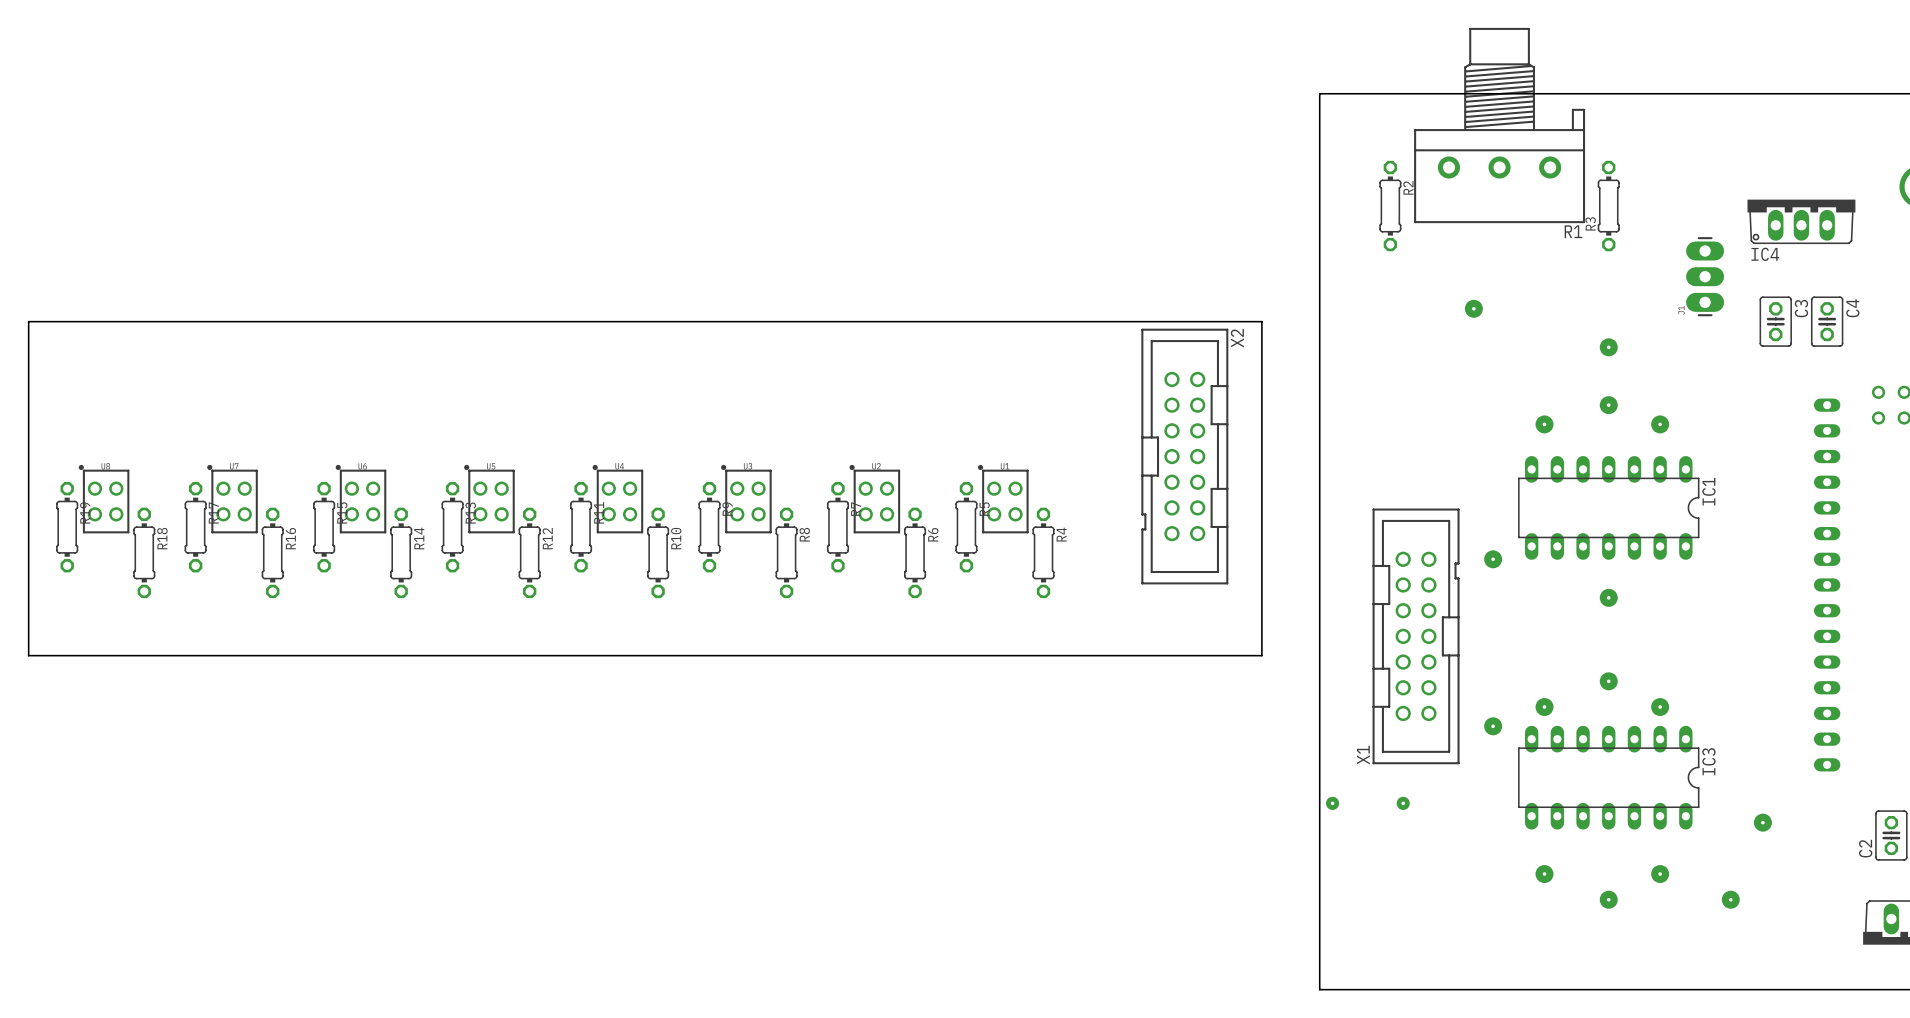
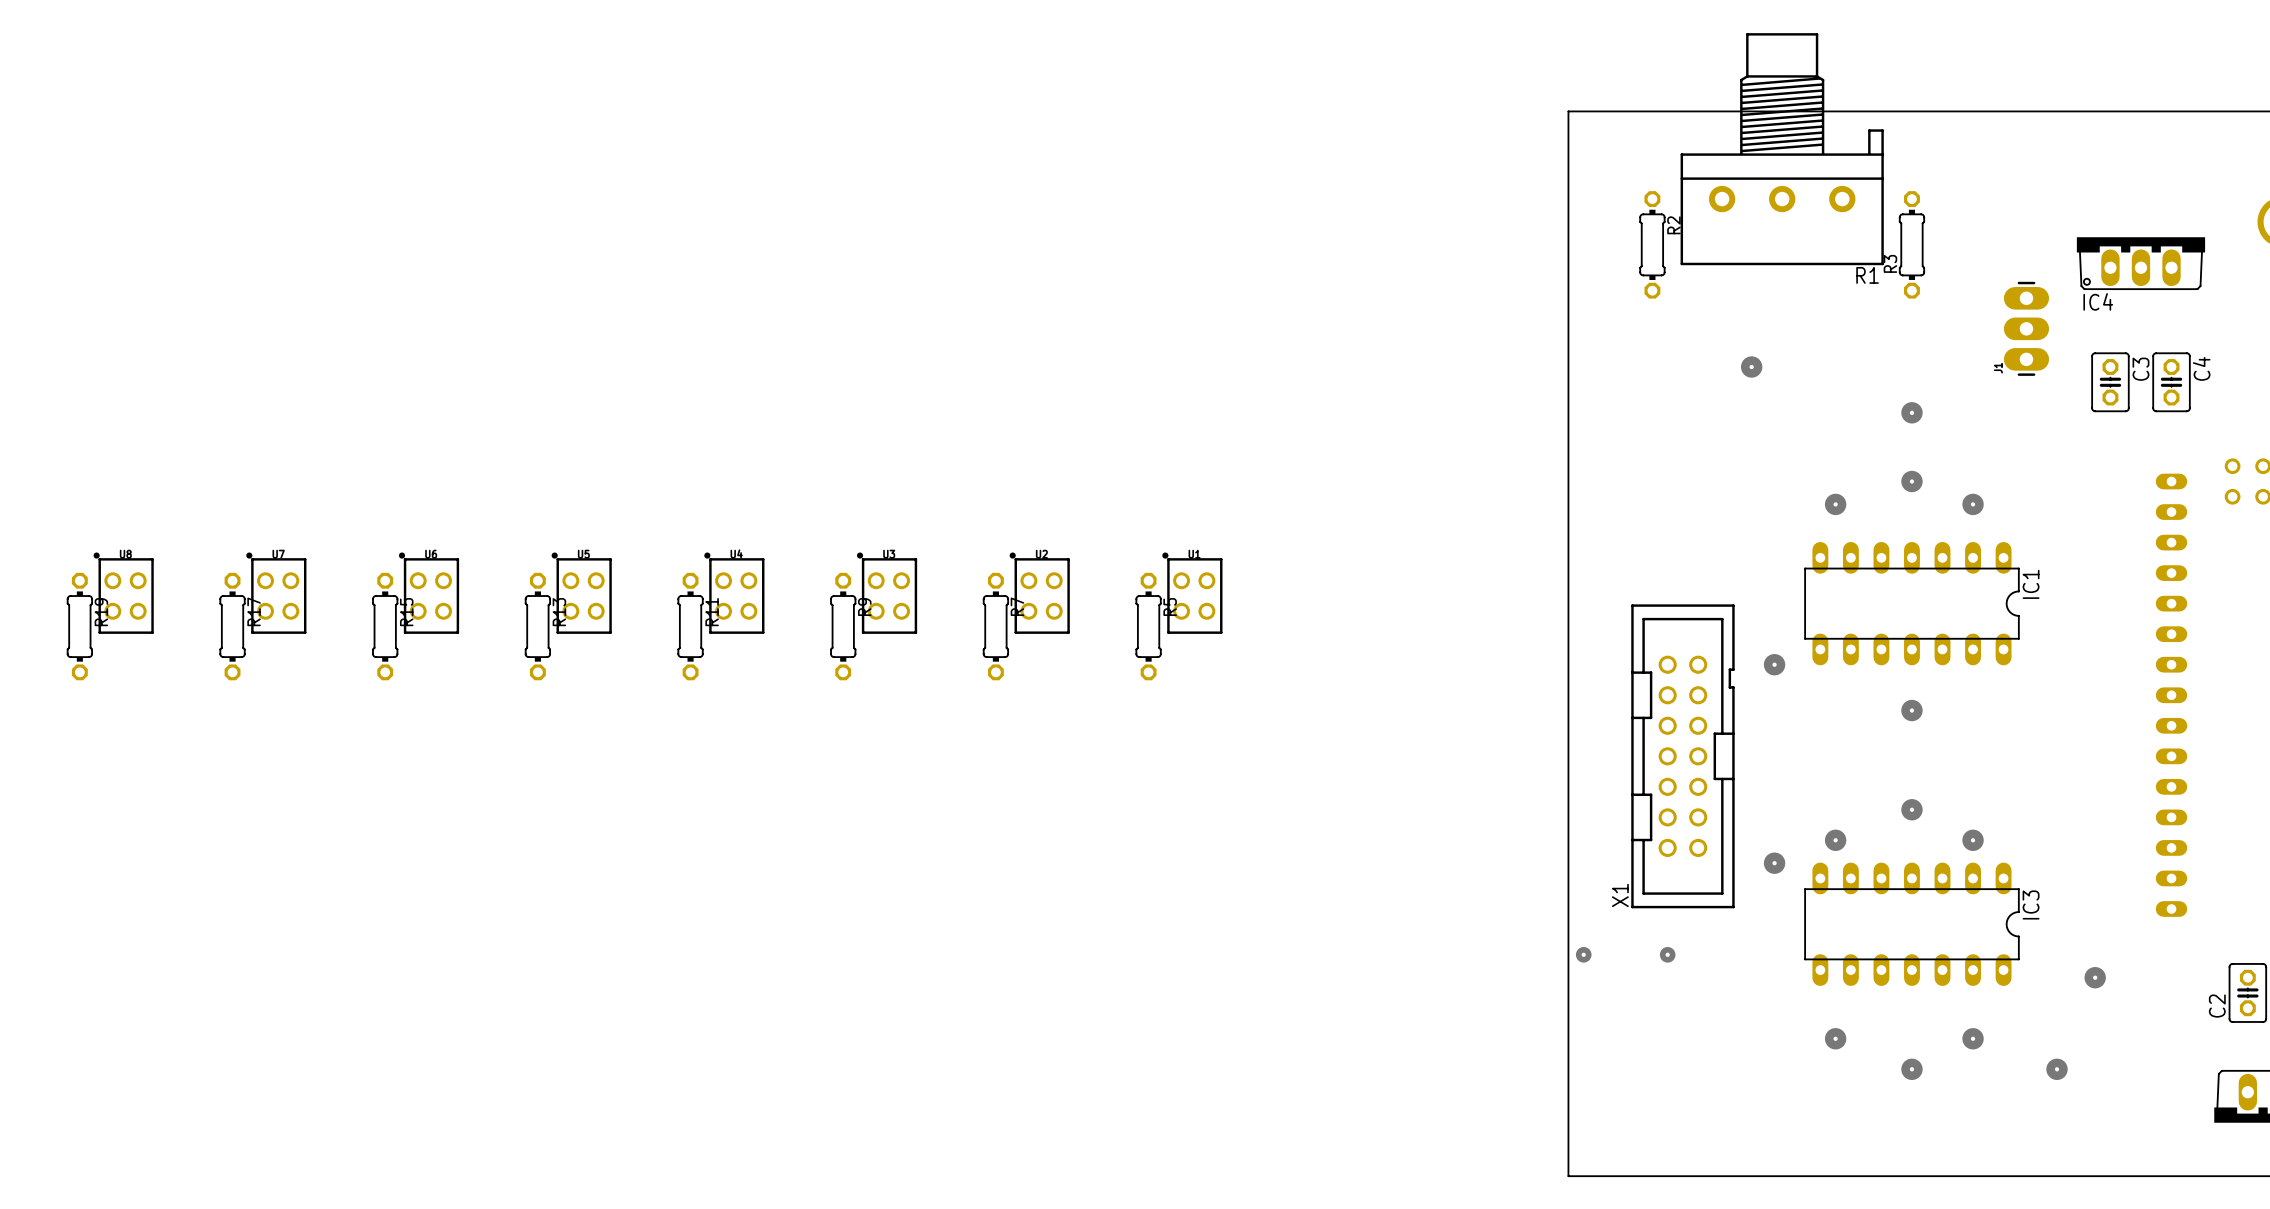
board edge: (28, 321) (1261, 321) (1261, 655) (28, 655) (28, 321) -> none
X2: (1184, 456) -> none
R18: (144, 552) -> none
R16: (272, 552) -> none
R14: (401, 552) -> none
R12: (529, 552) -> none
R10: (658, 552) -> none
R8: (786, 552) -> none
R6: (915, 552) -> none
R4: (1043, 552) -> none

